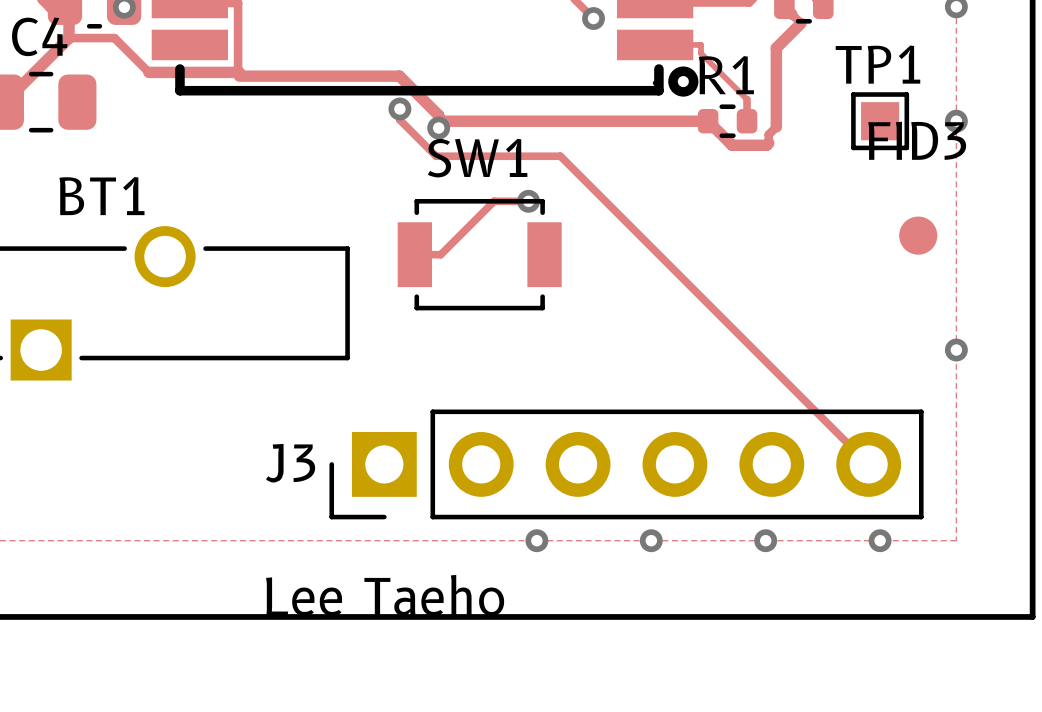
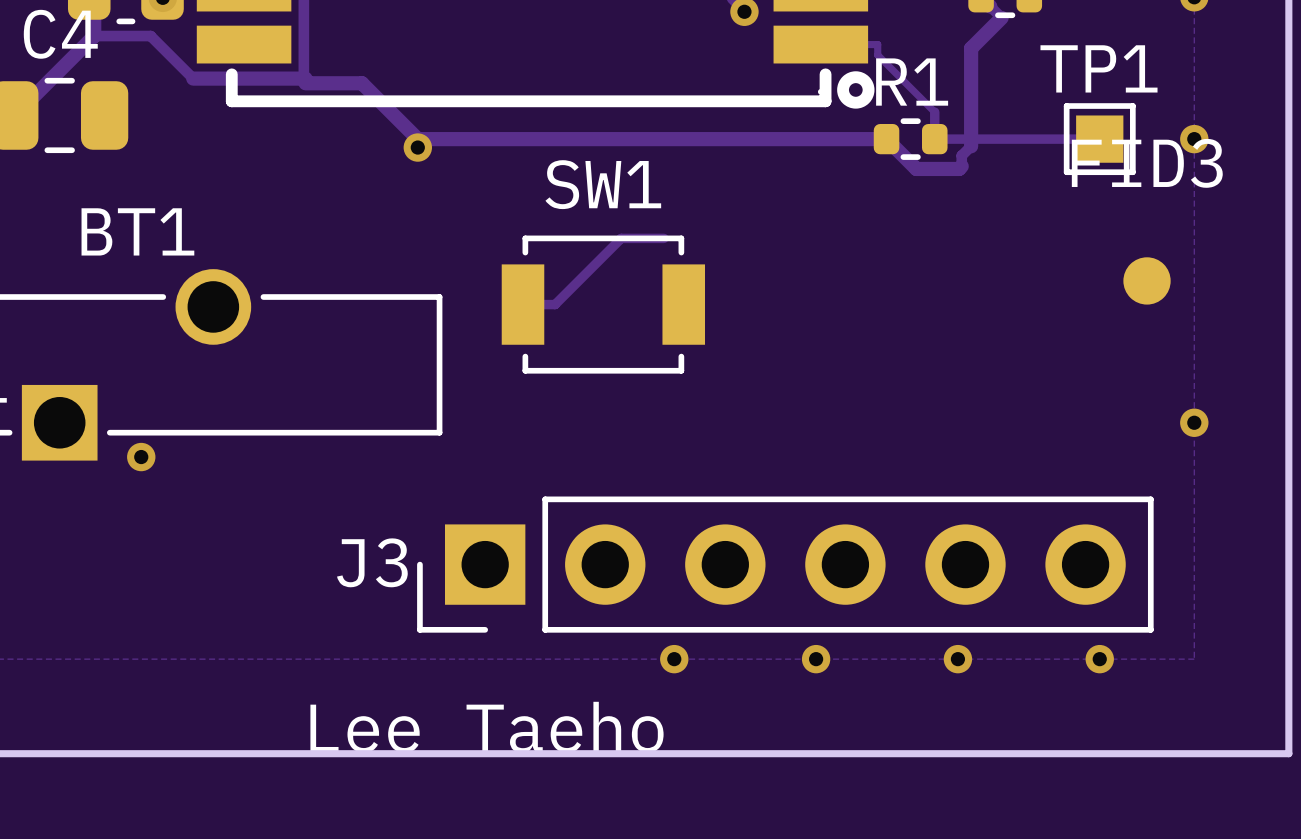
track: (284, 76) (399, 76) (438, 115) (438, 128) -> (361, 83) (417, 139)
track: (399, 108) (399, 120) (436, 156) (560, 156) (868, 464) -> none
via: (399, 108) -> none
track: none -> (417, 139) (552, 139)
track: none -> (934, 139) (1099, 139)
via: none -> (417, 147)
via: (438, 128) -> none
via: (528, 201) -> none
via: none -> (141, 457)

